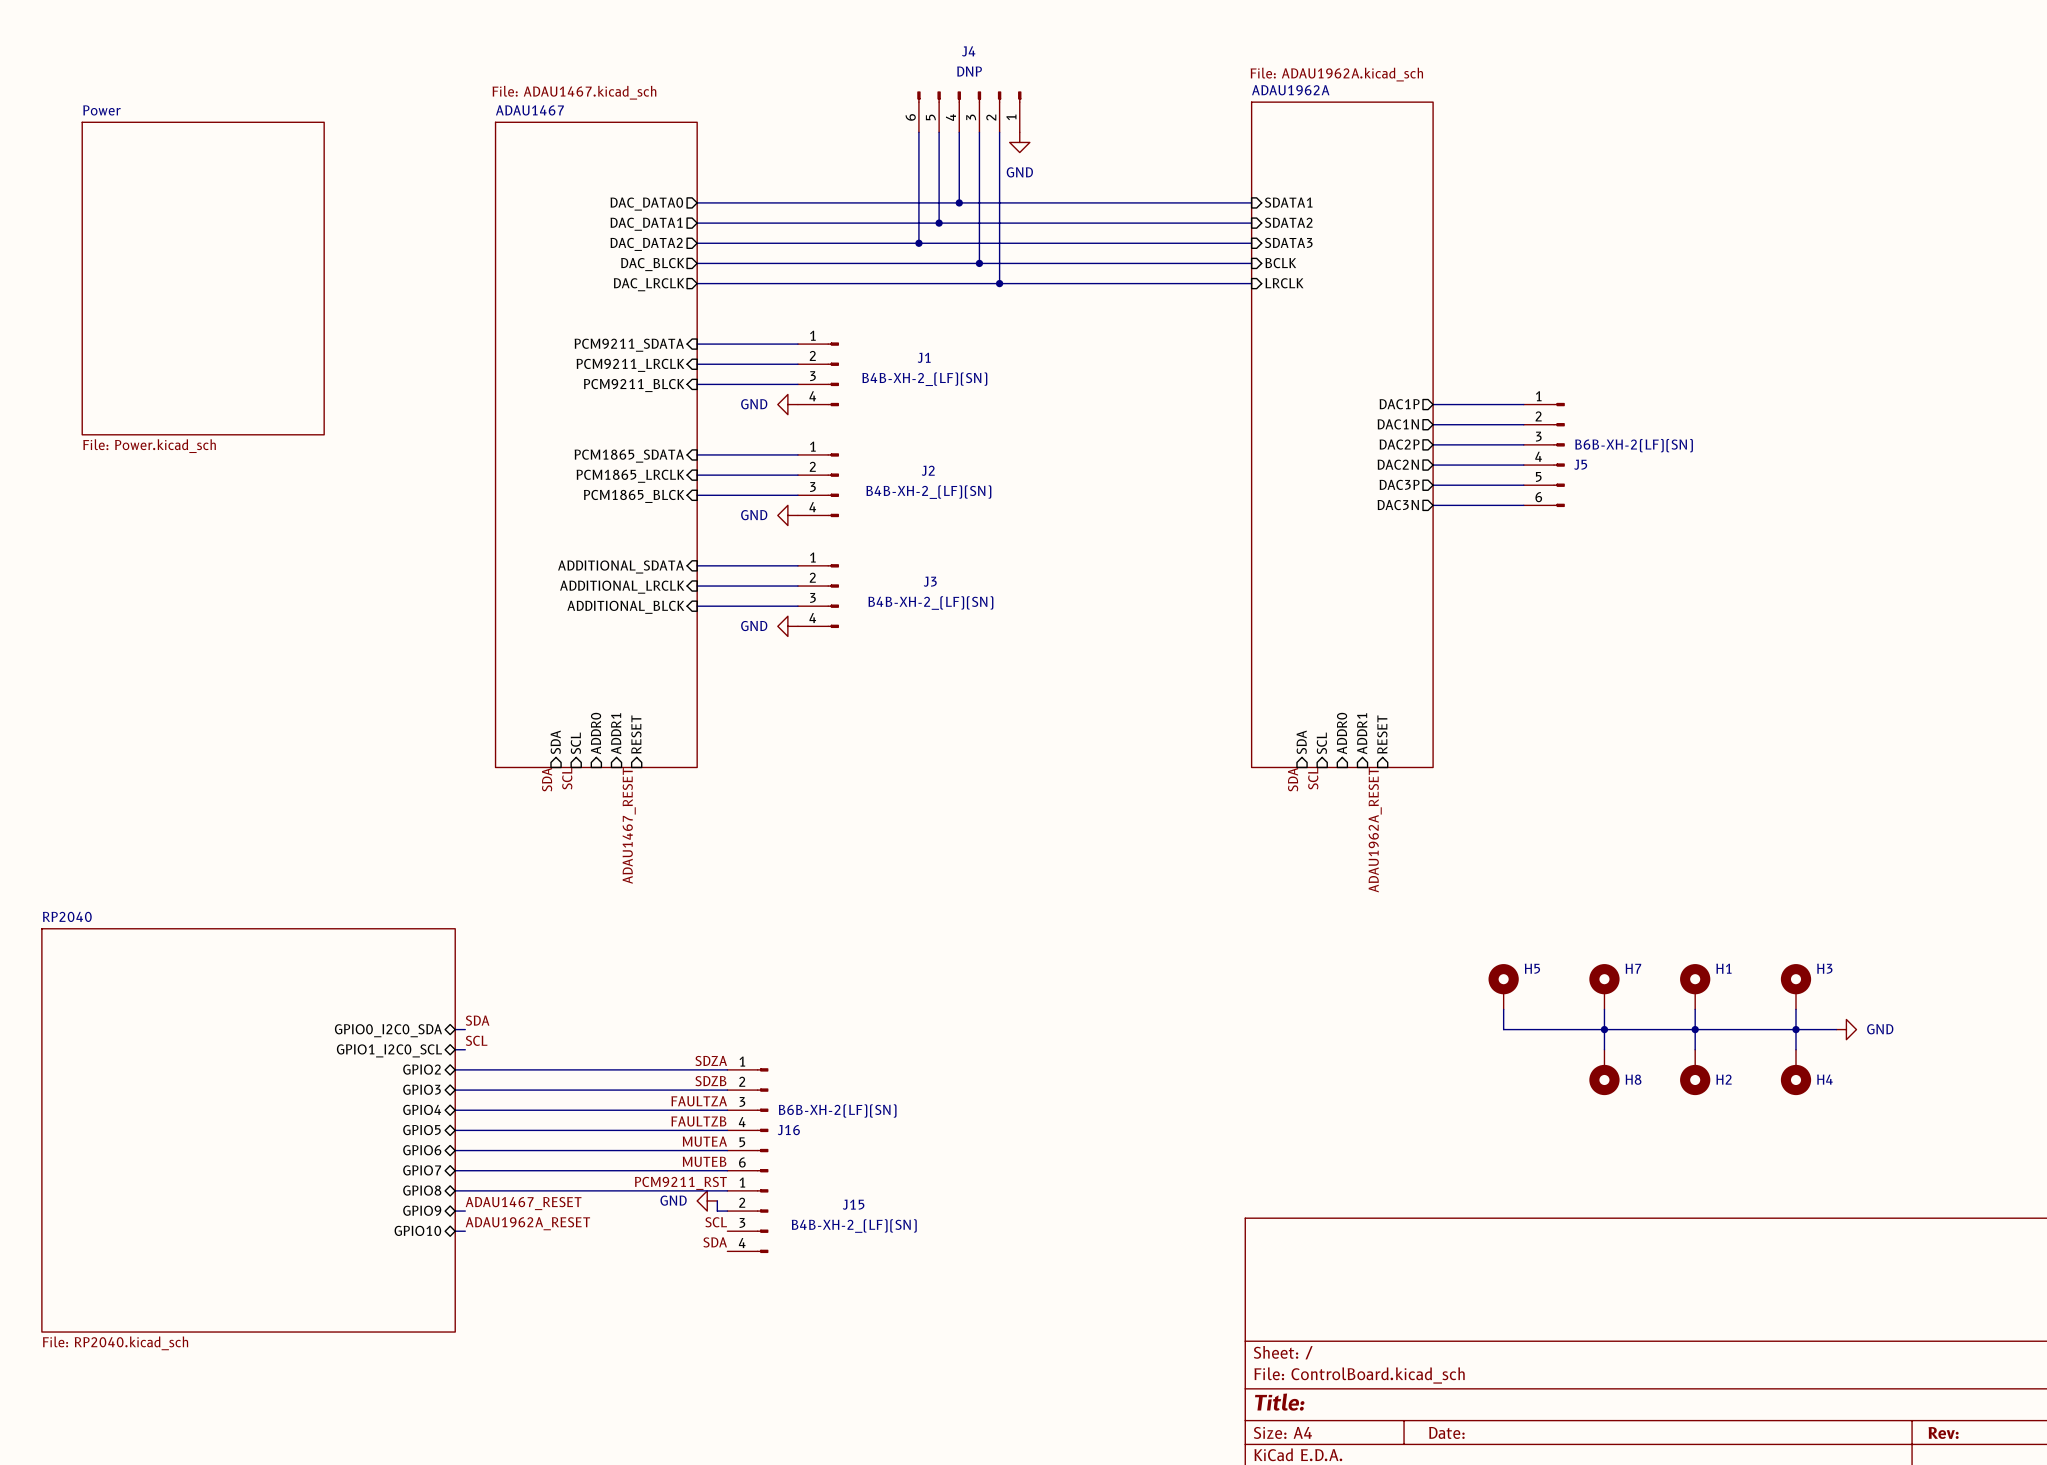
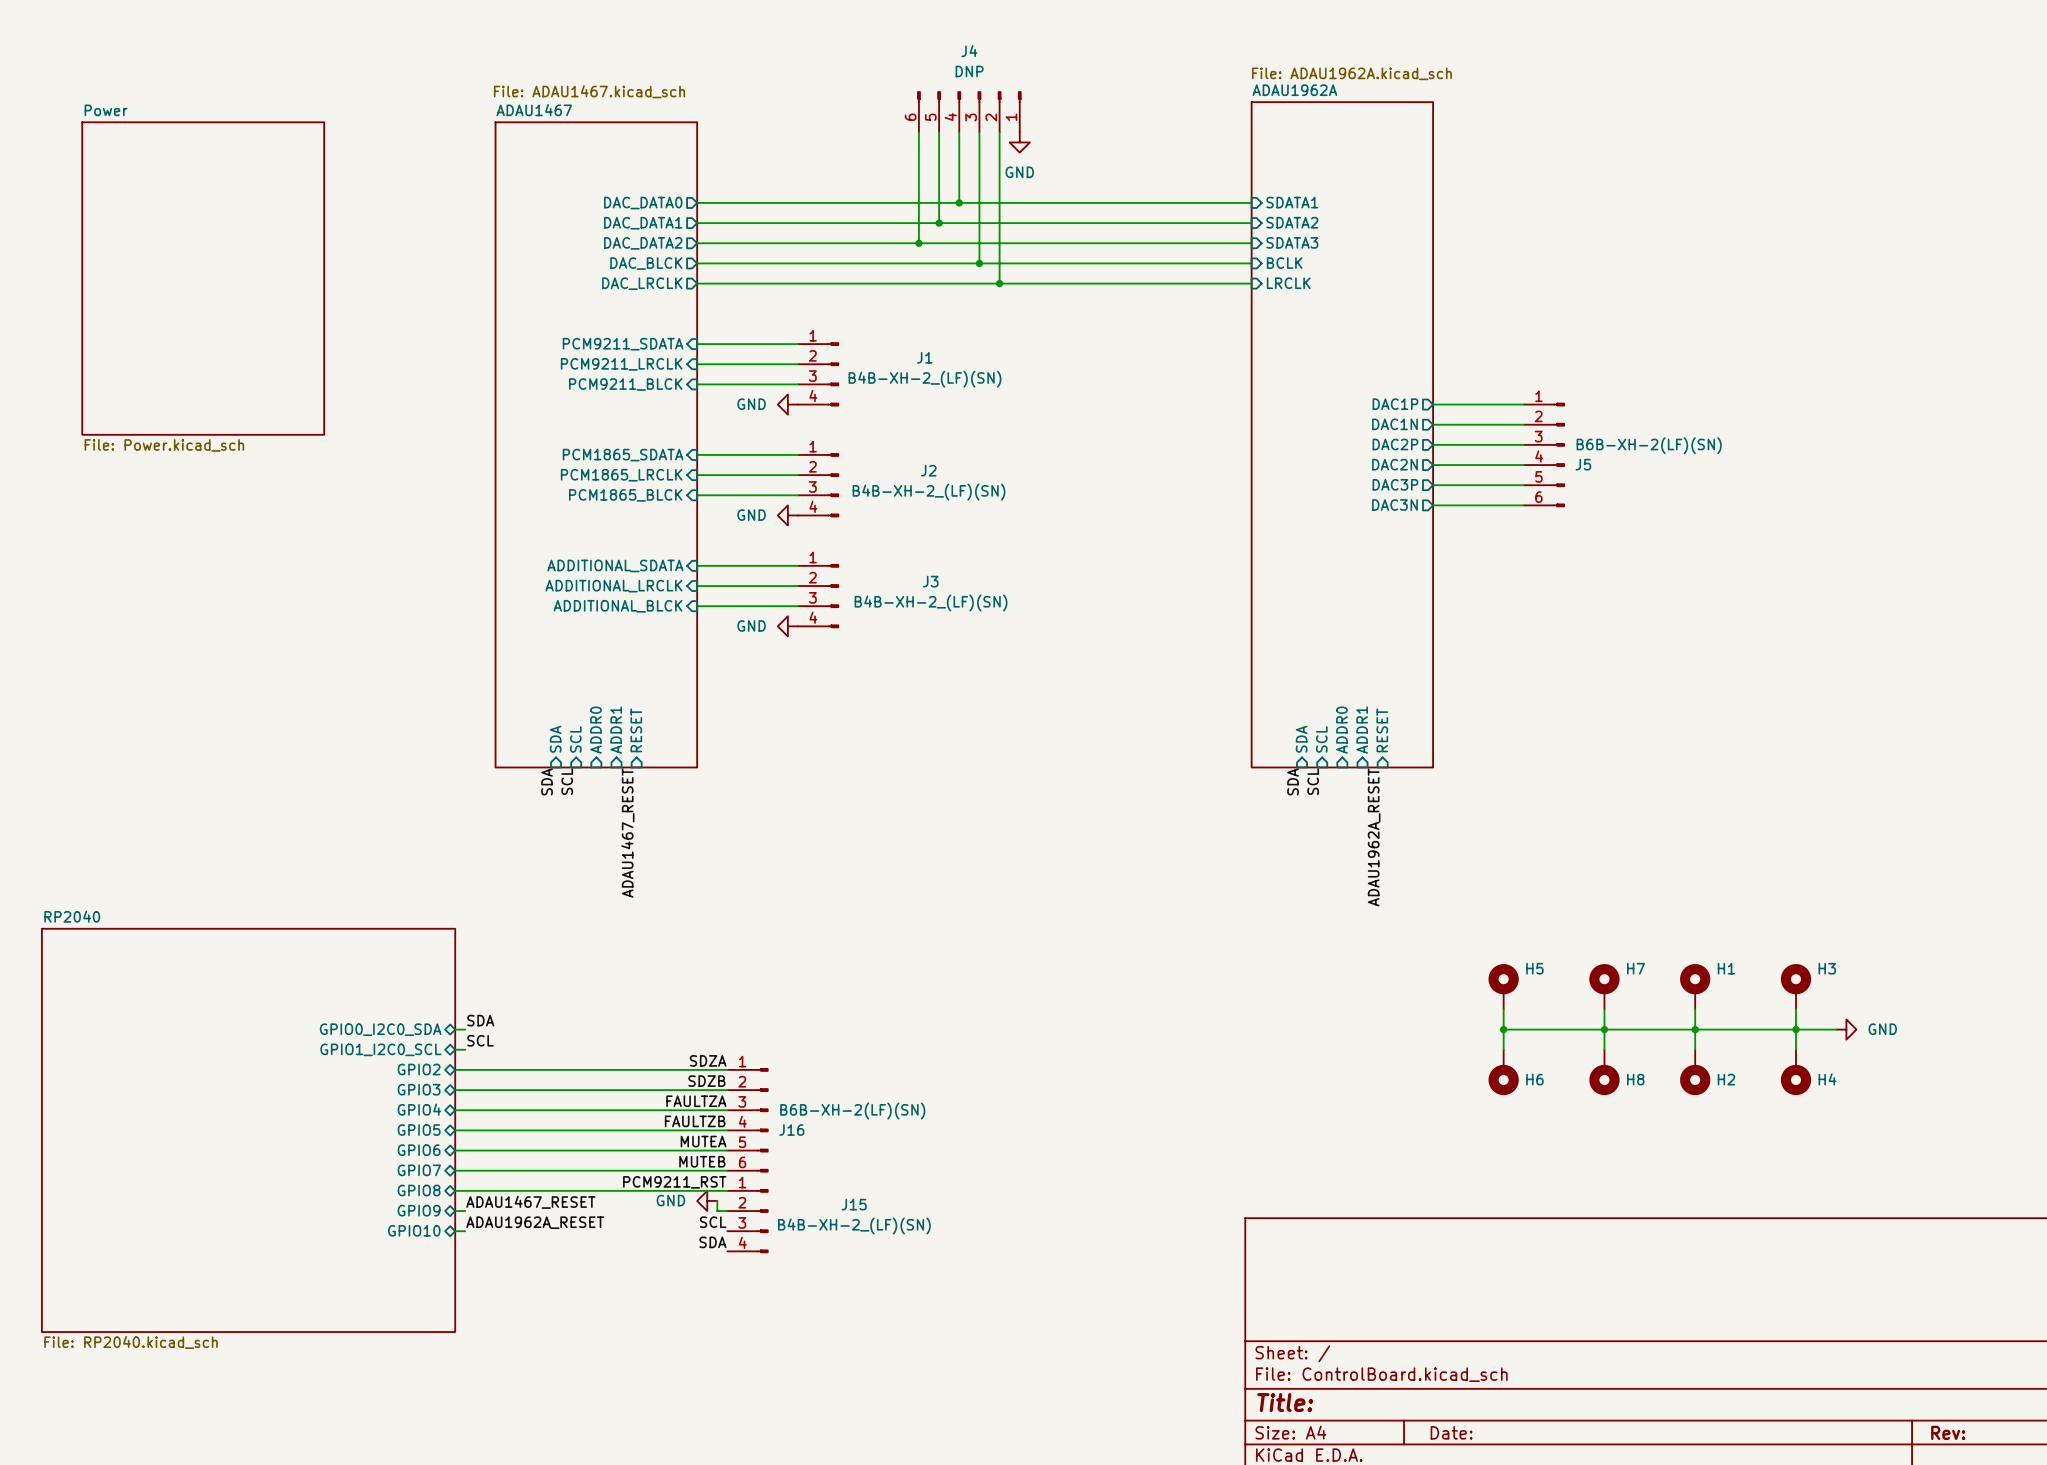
wire: none -> (1503, 1029) (1503, 1049)
junction: none -> (1503, 1029)
H6: none -> (1503, 1072)

